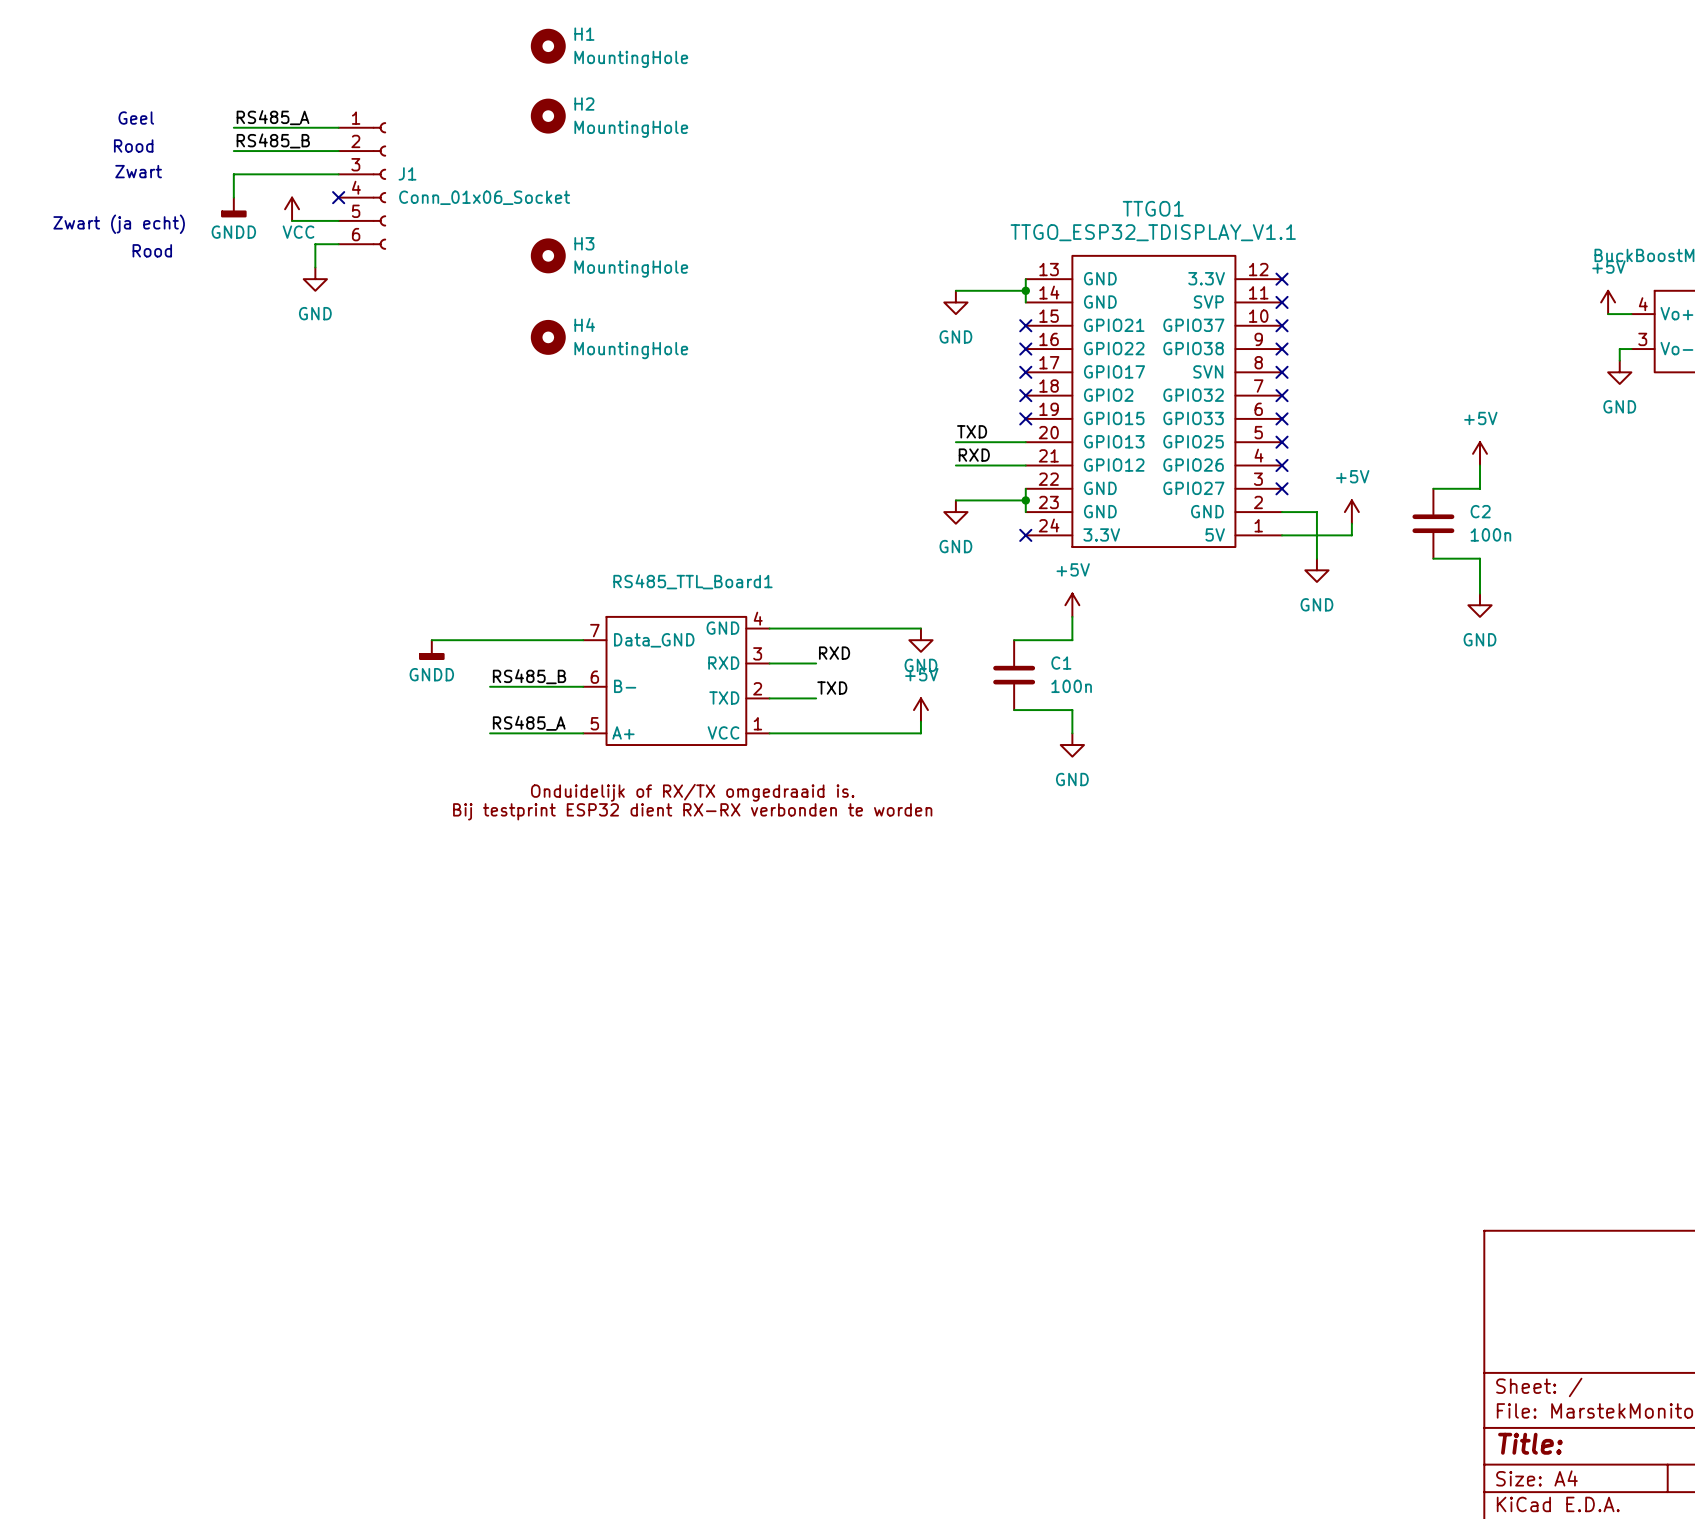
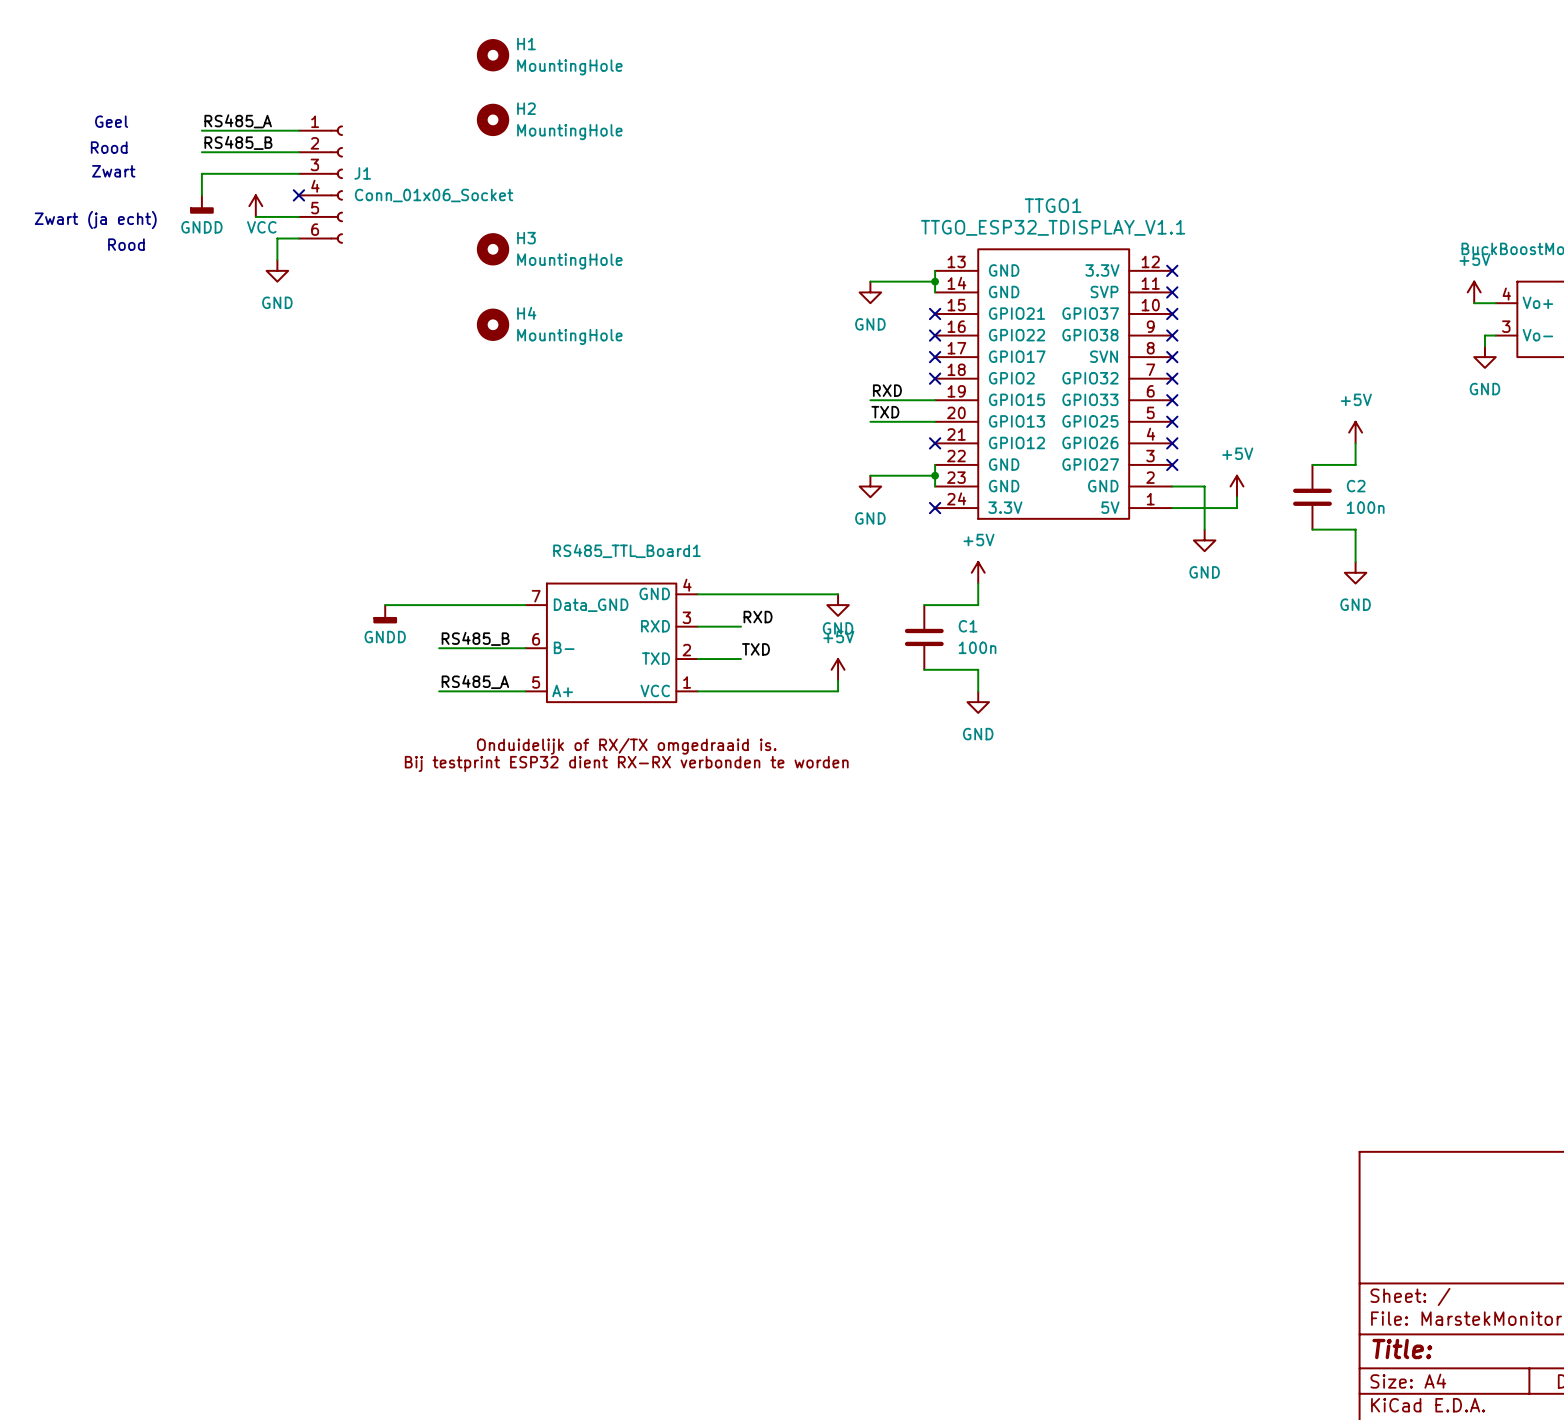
no-connect mark position: (1025, 418) -> (935, 443)
label position: RXD (974, 455) -> RXD (887, 390)
wire: (955, 465) (1025, 465) -> (870, 400) (935, 400)

